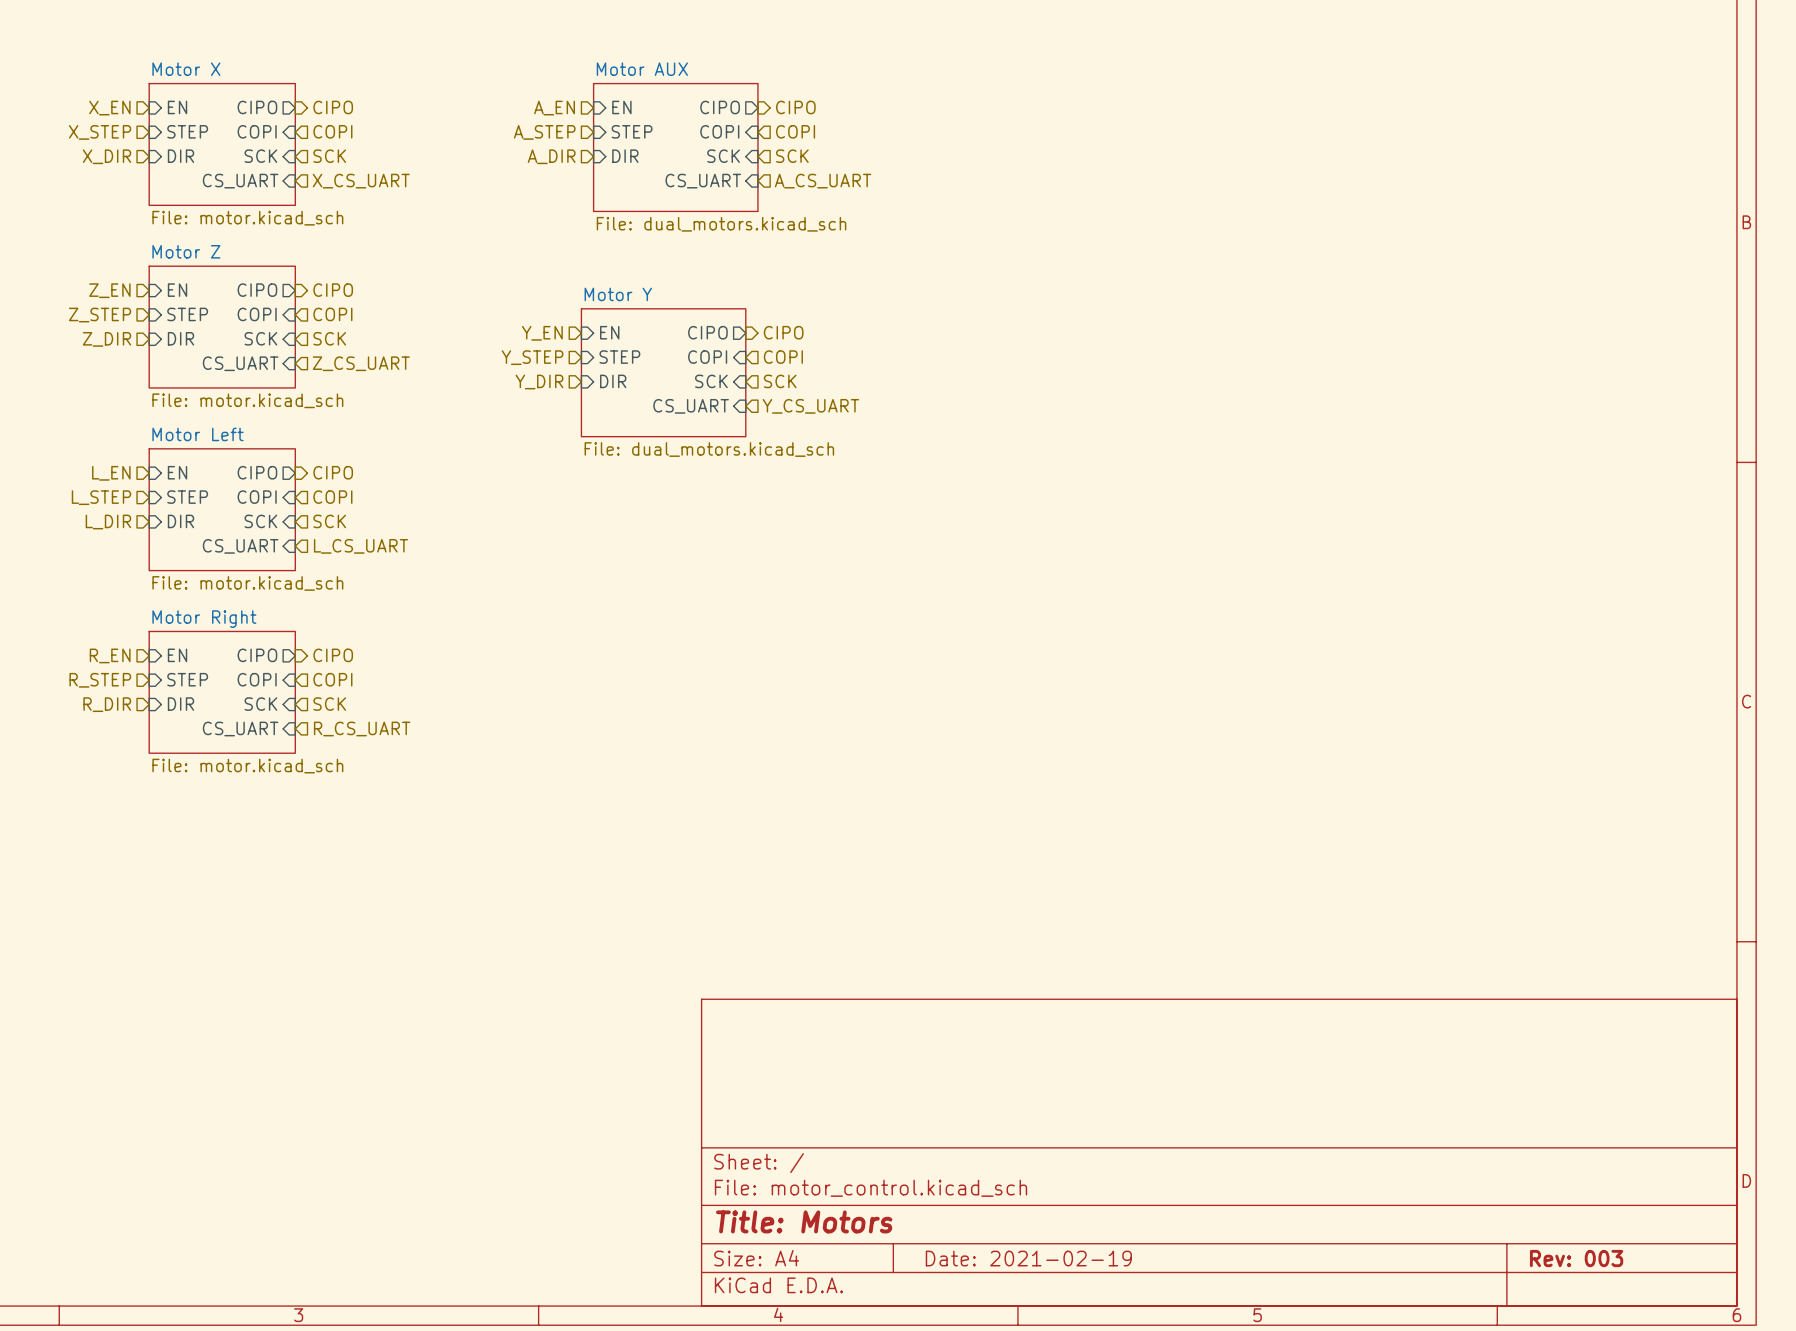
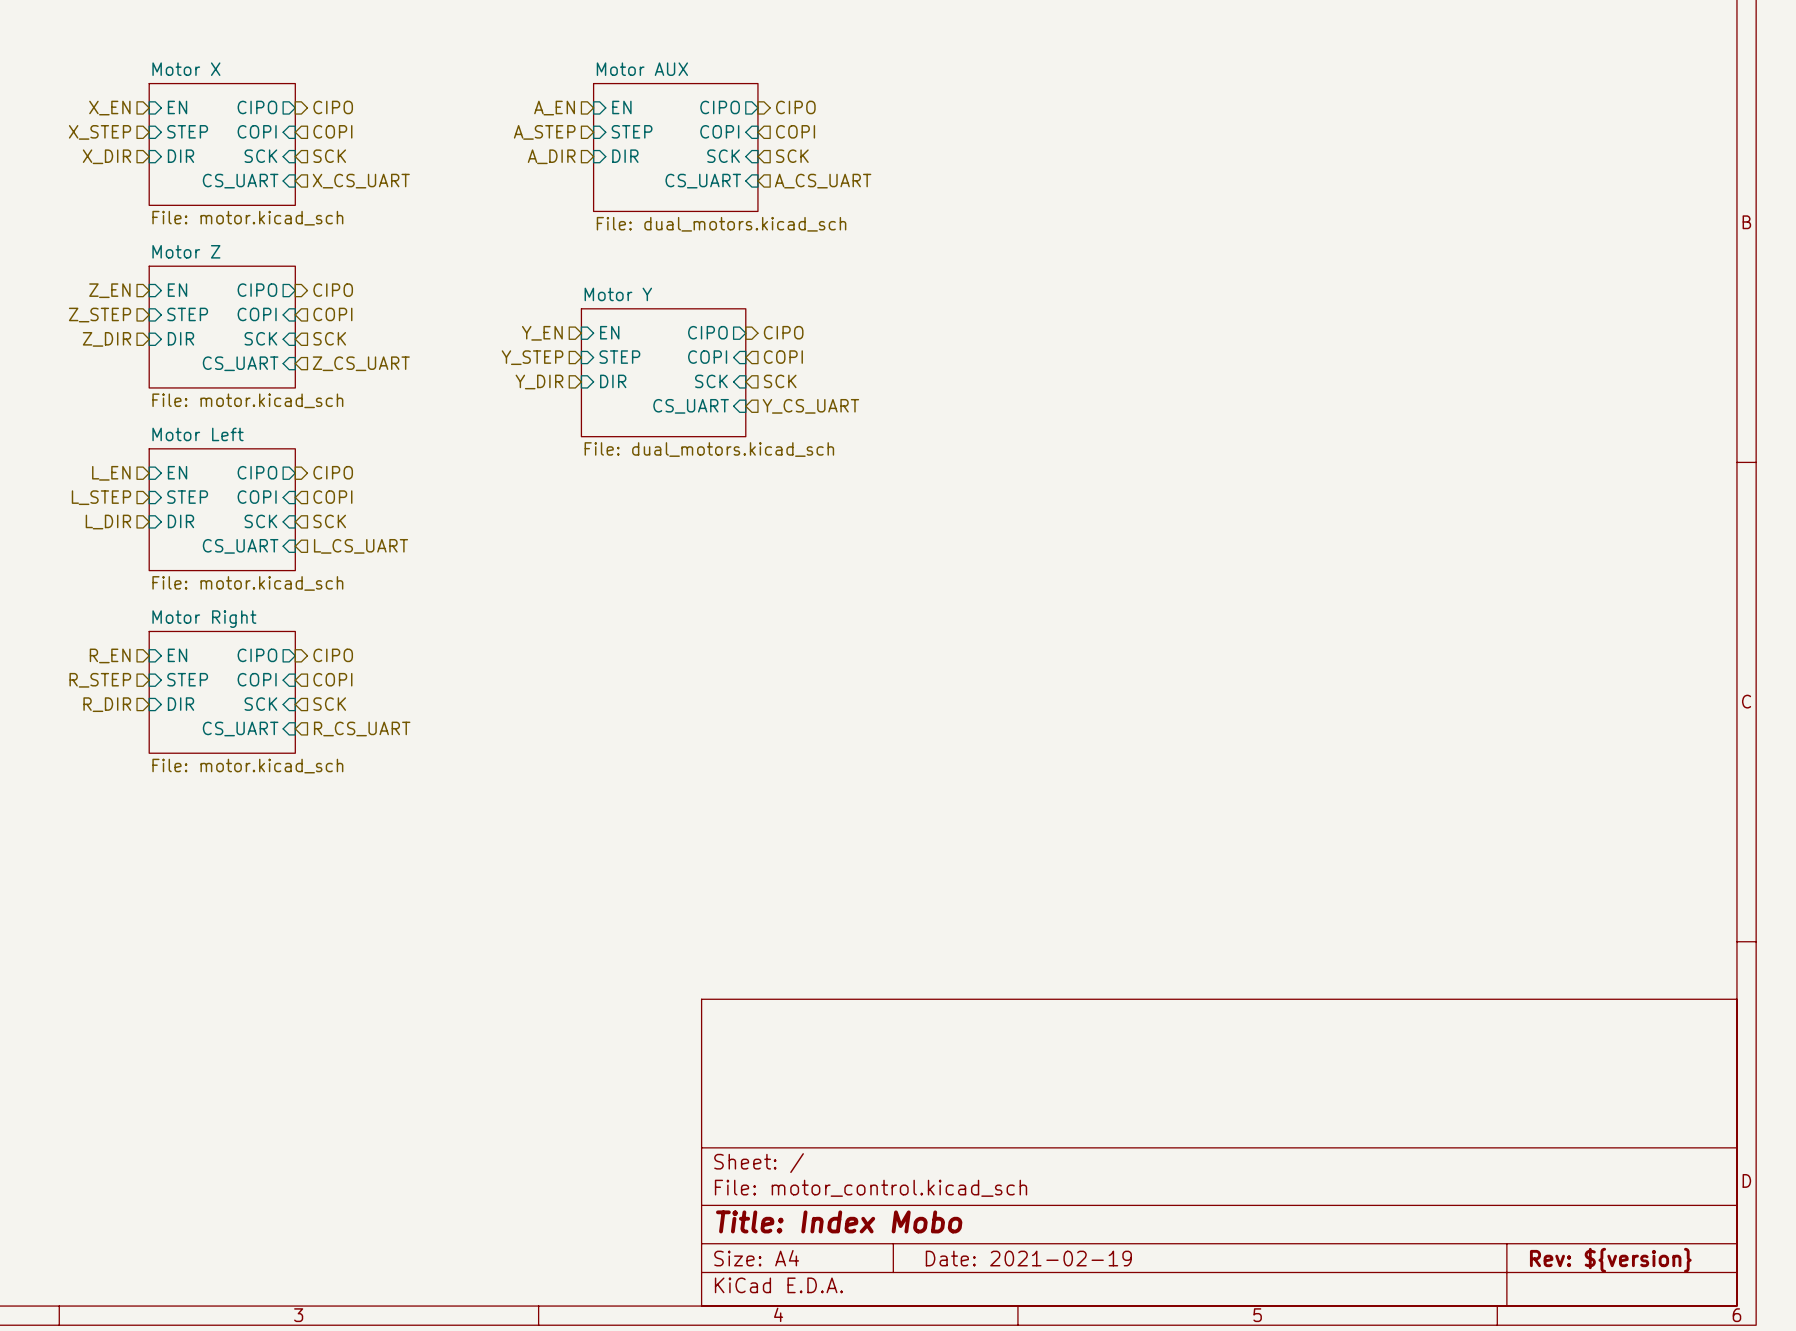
title block: Title: Motors (804, 1221) -> Title: Index Mobo (839, 1221)
title block: Rev: 003 (1576, 1258) -> Rev: ${version} (1610, 1260)

